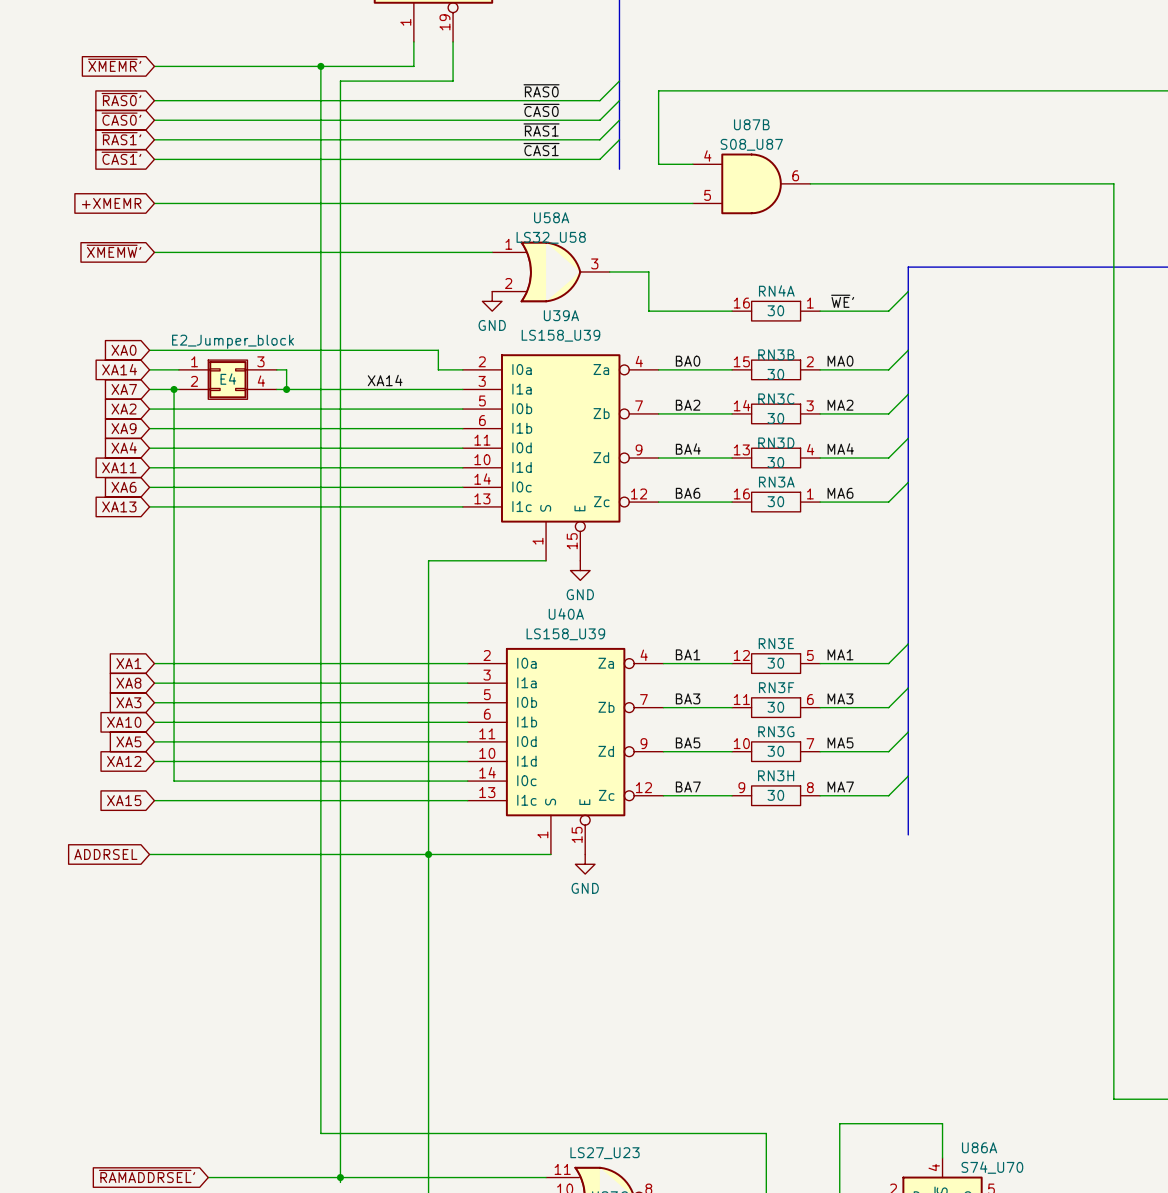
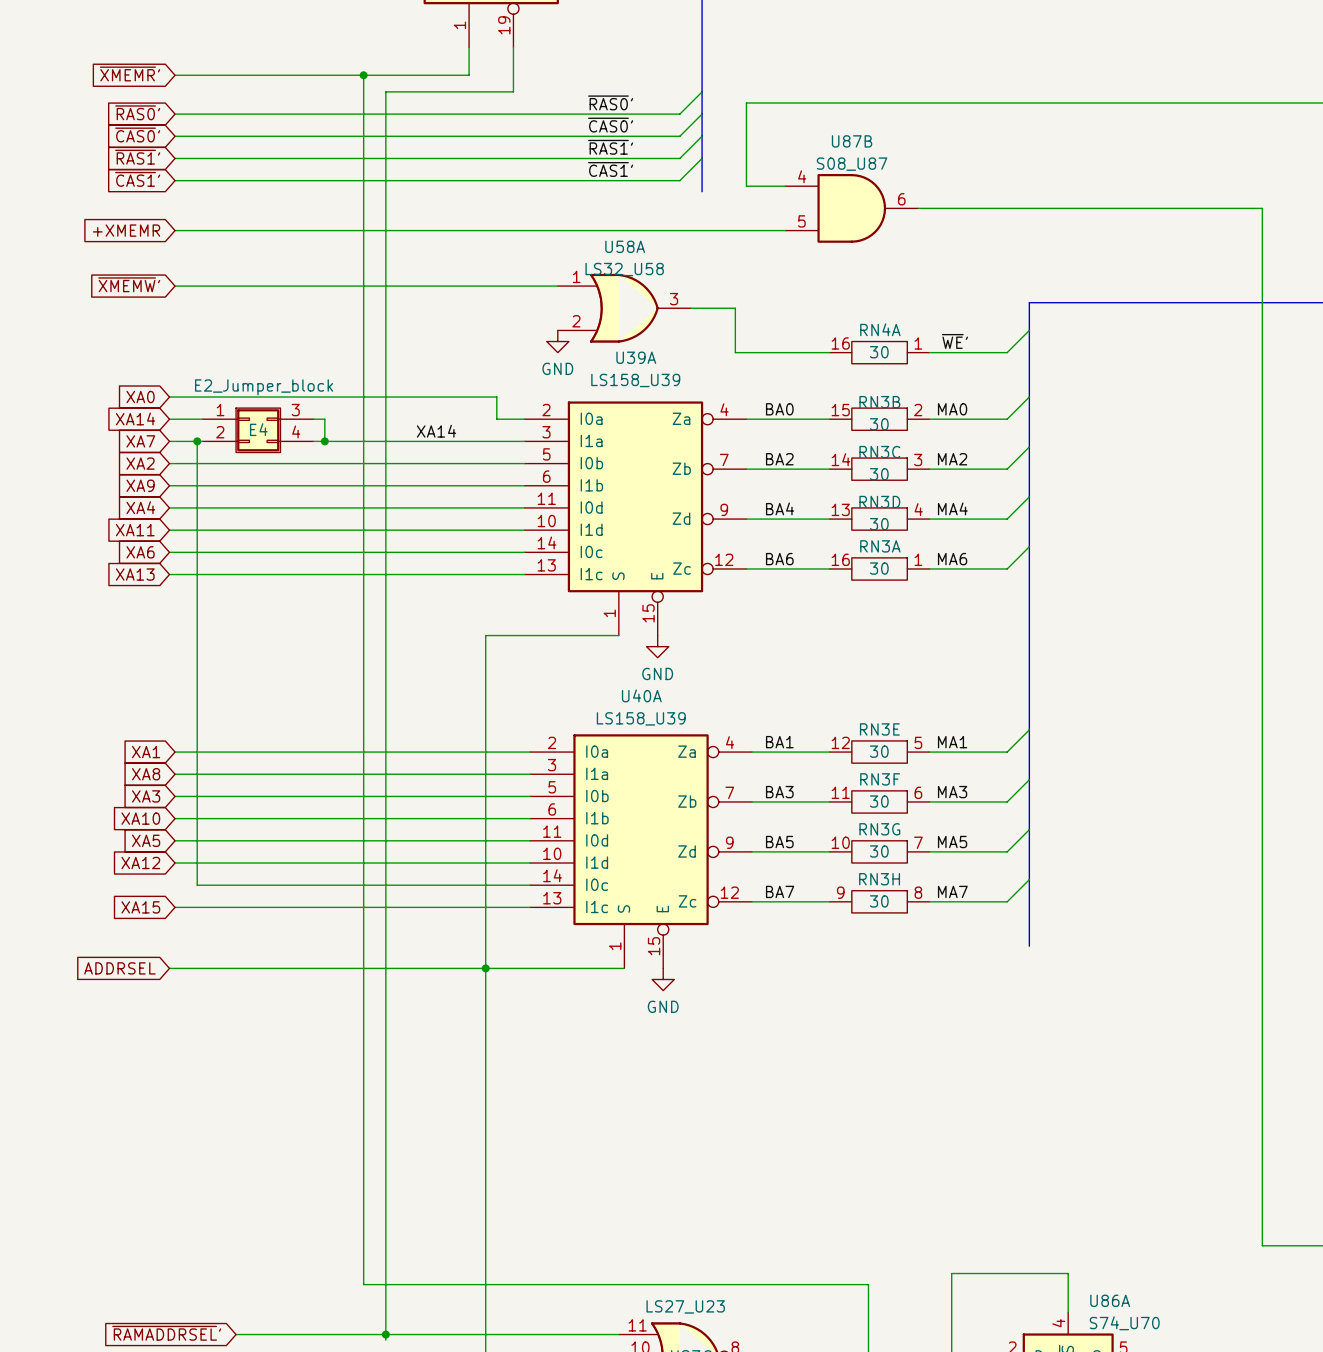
label: ~{RAS0} (541, 90) -> ~{RAS0}' (610, 102)
label: ~{CAS0} (541, 110) -> ~{CAS0}' (610, 125)
label: ~{RAS1} (541, 129) -> ~{RAS1}' (610, 147)
label: ~{CAS1} (541, 149) -> ~{CAS1}' (610, 169)

